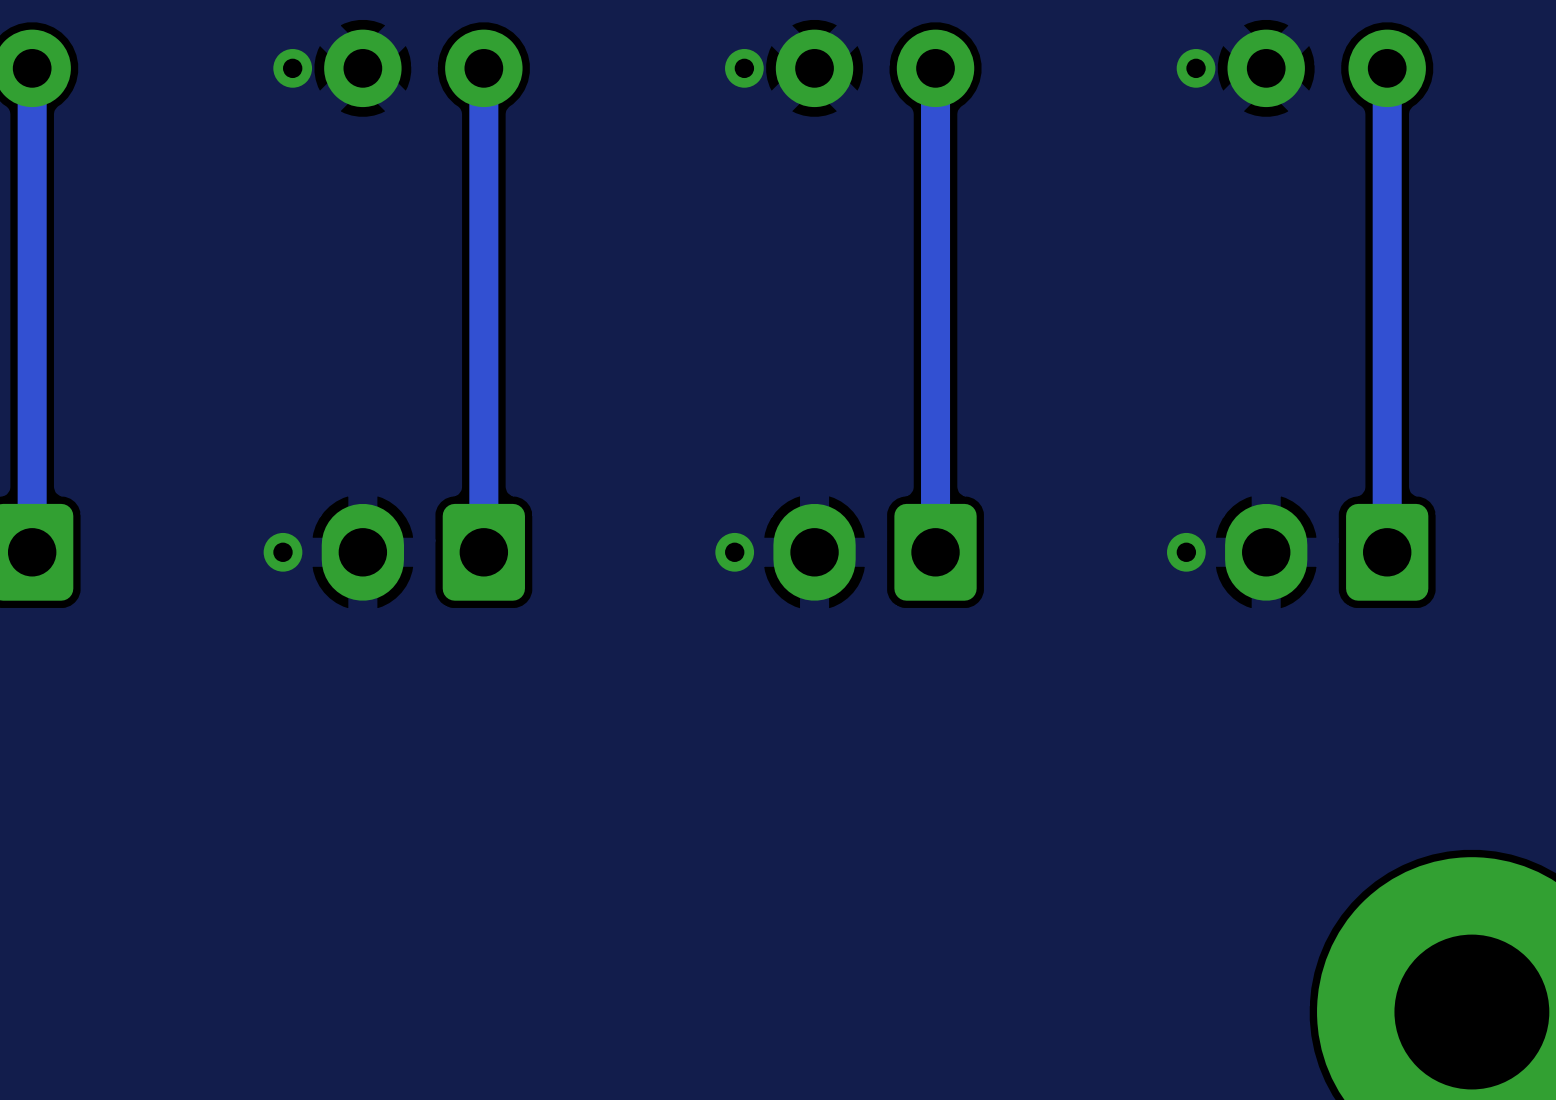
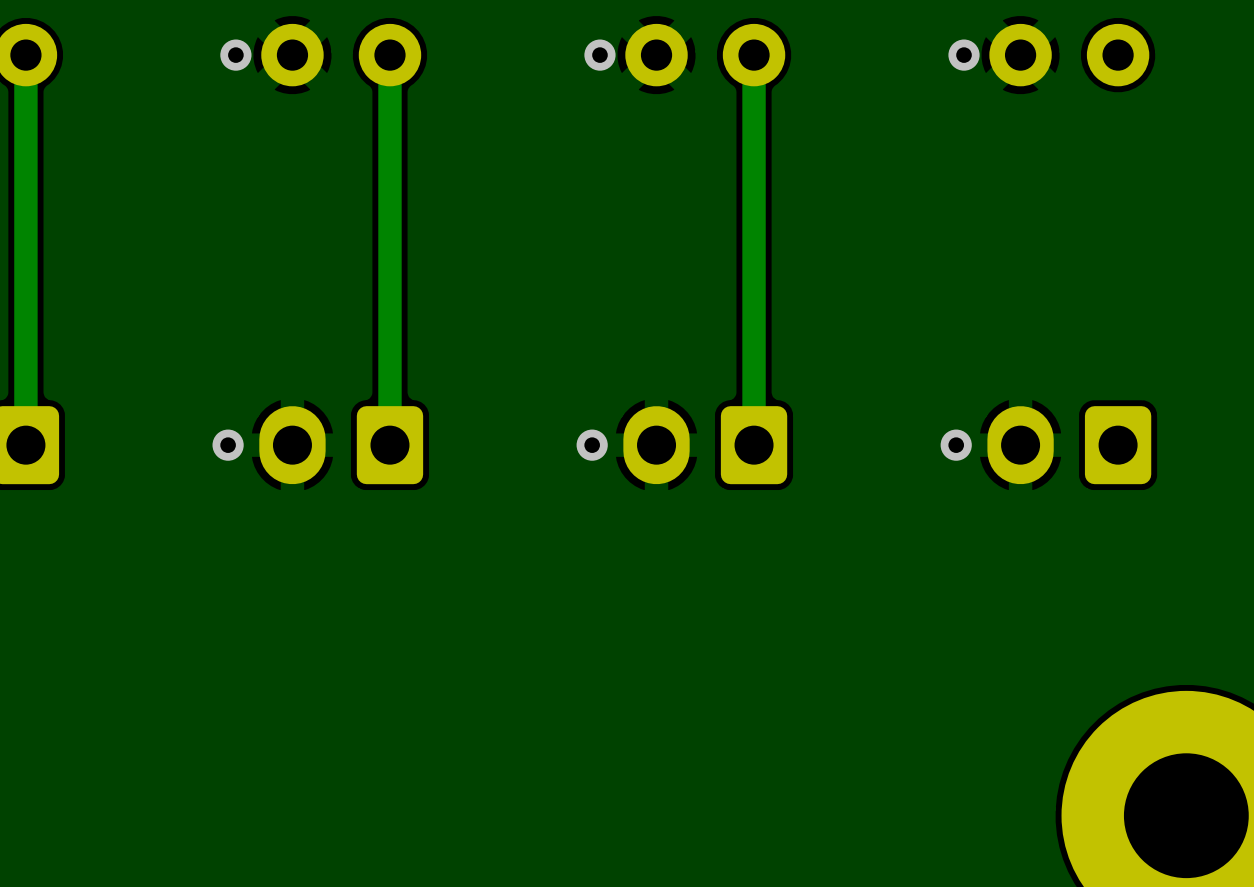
track: (1387, 68) (1387, 552) -> none

